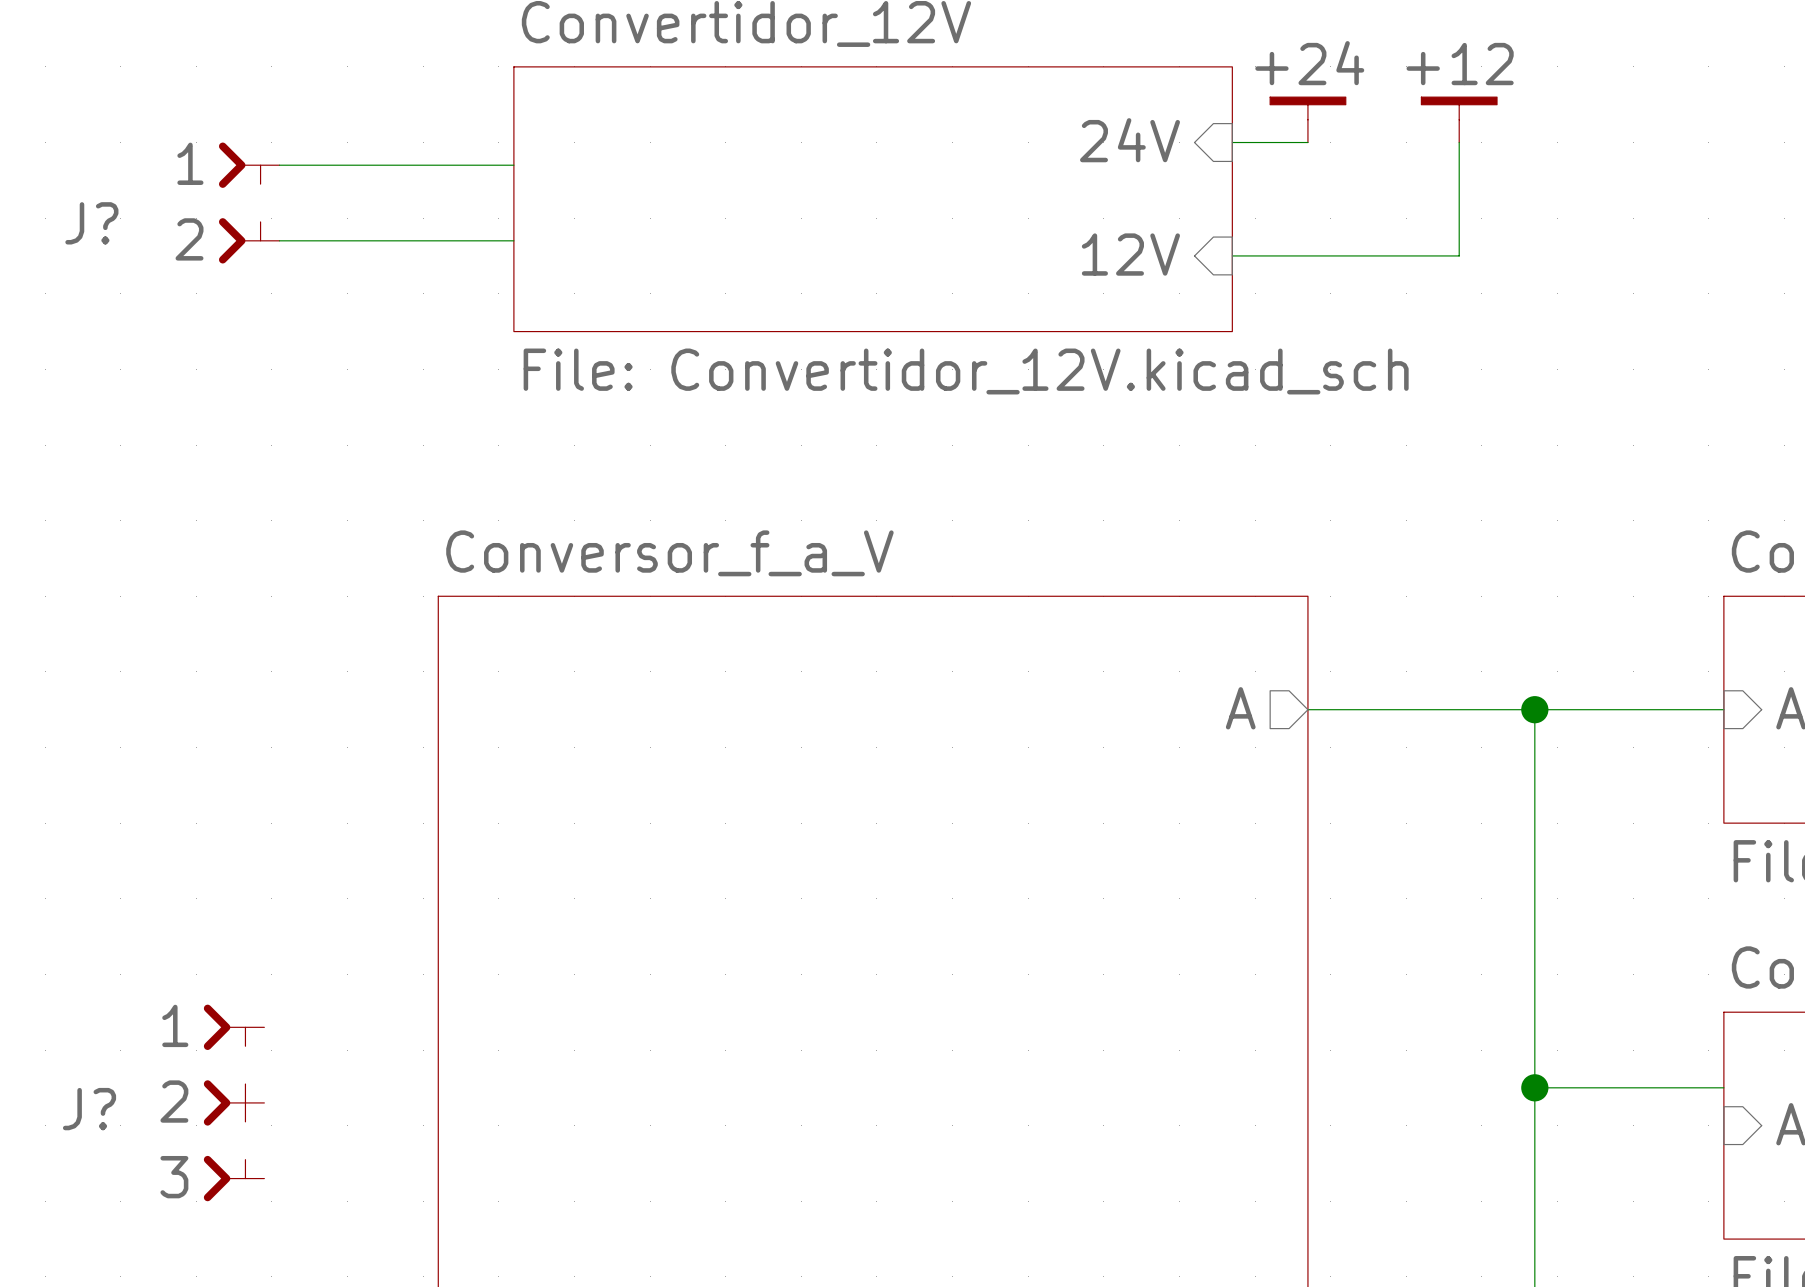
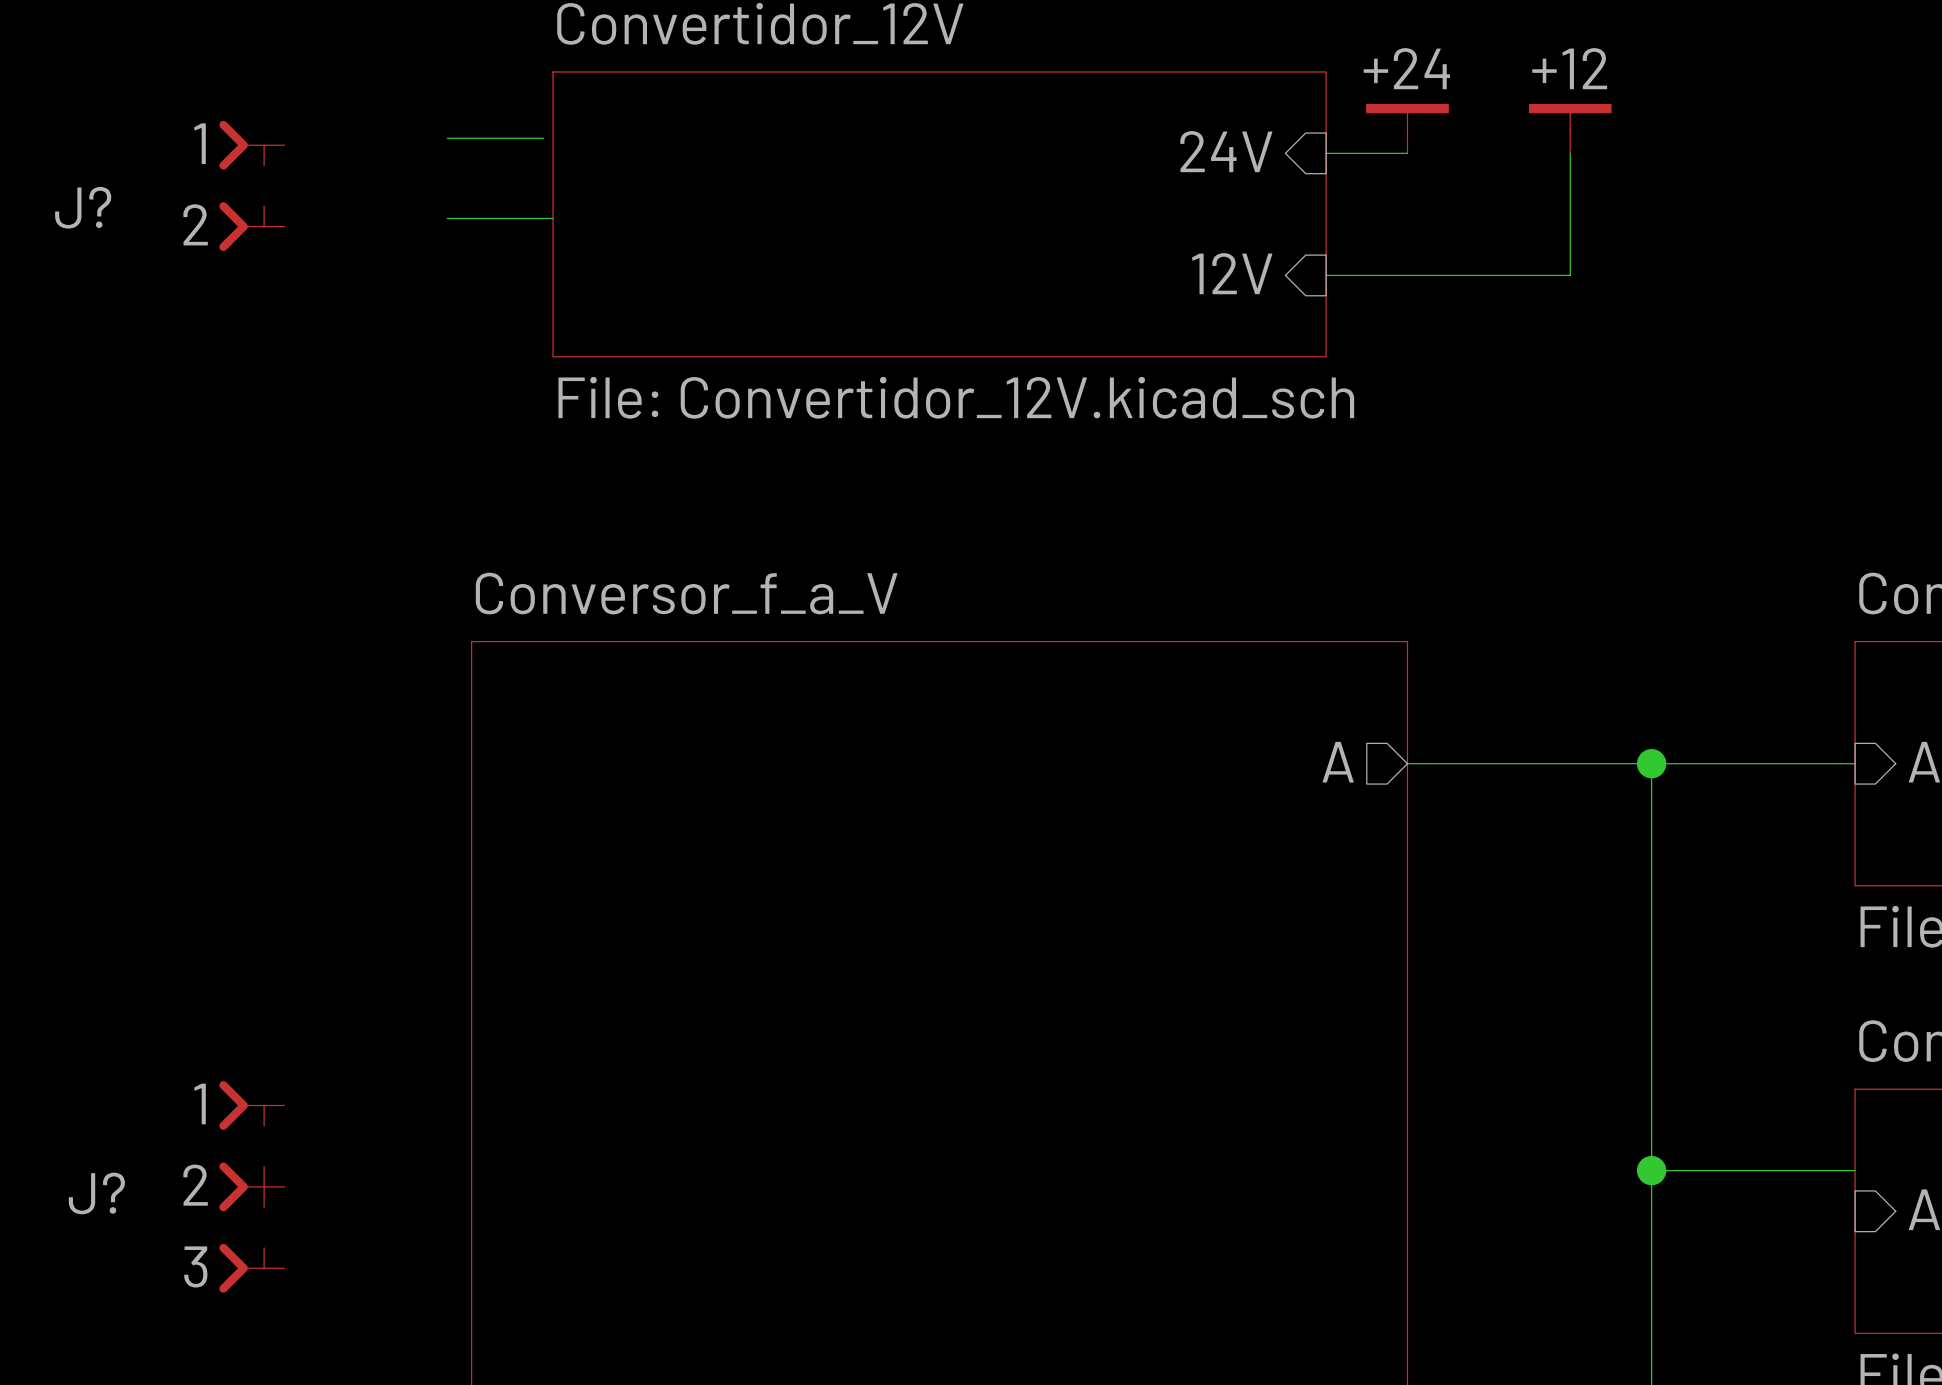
wire: none -> (447, 138) (543, 138)
wire: (279, 165) (513, 165) -> none
J? position: (249, 203) -> (251, 185)
wire: none -> (447, 218) (553, 218)
wire: (279, 240) (513, 240) -> none

